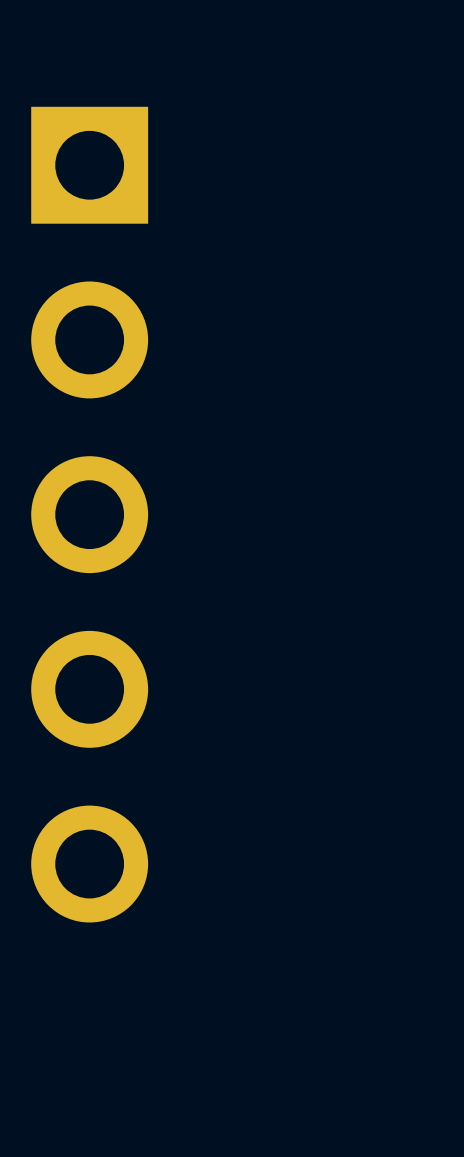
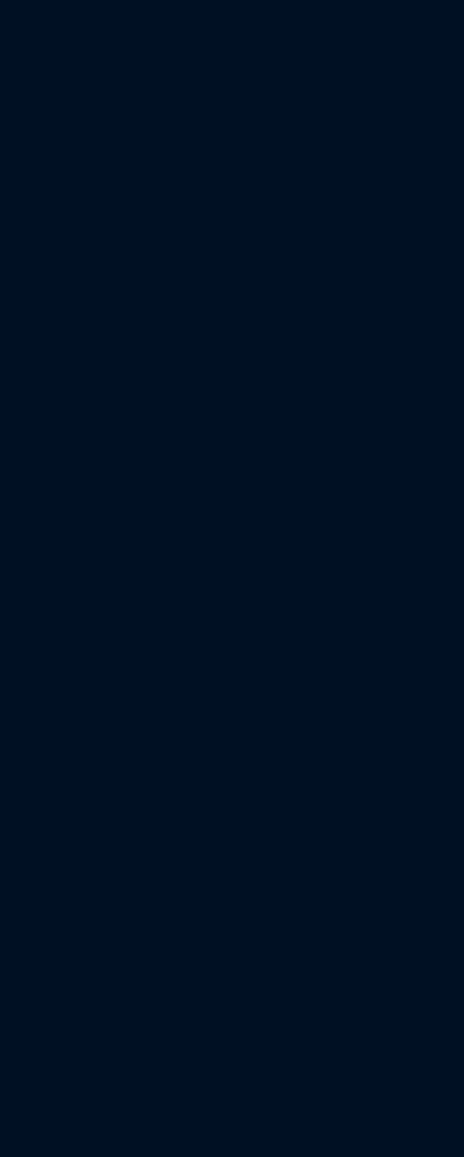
part: (89, 514) -> none

